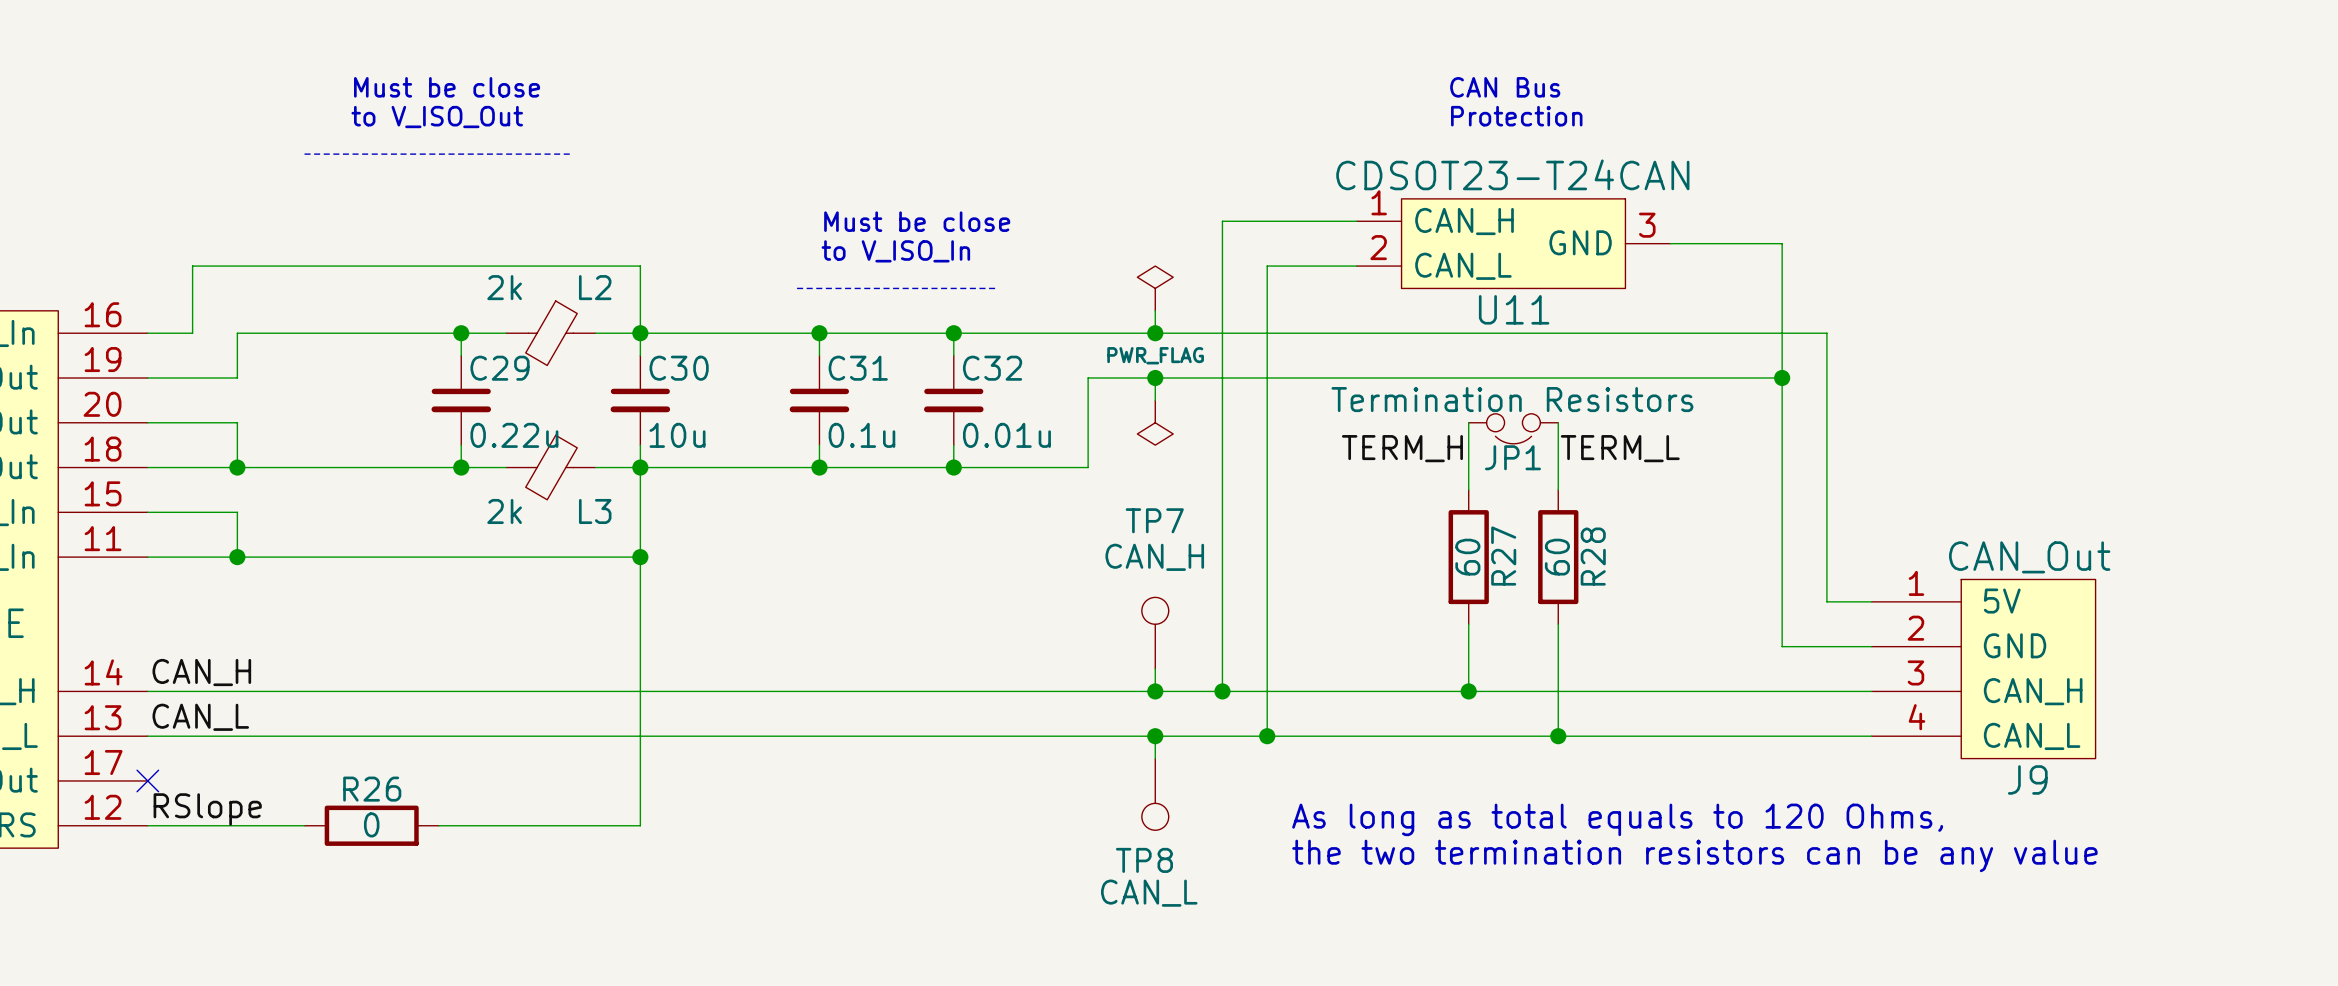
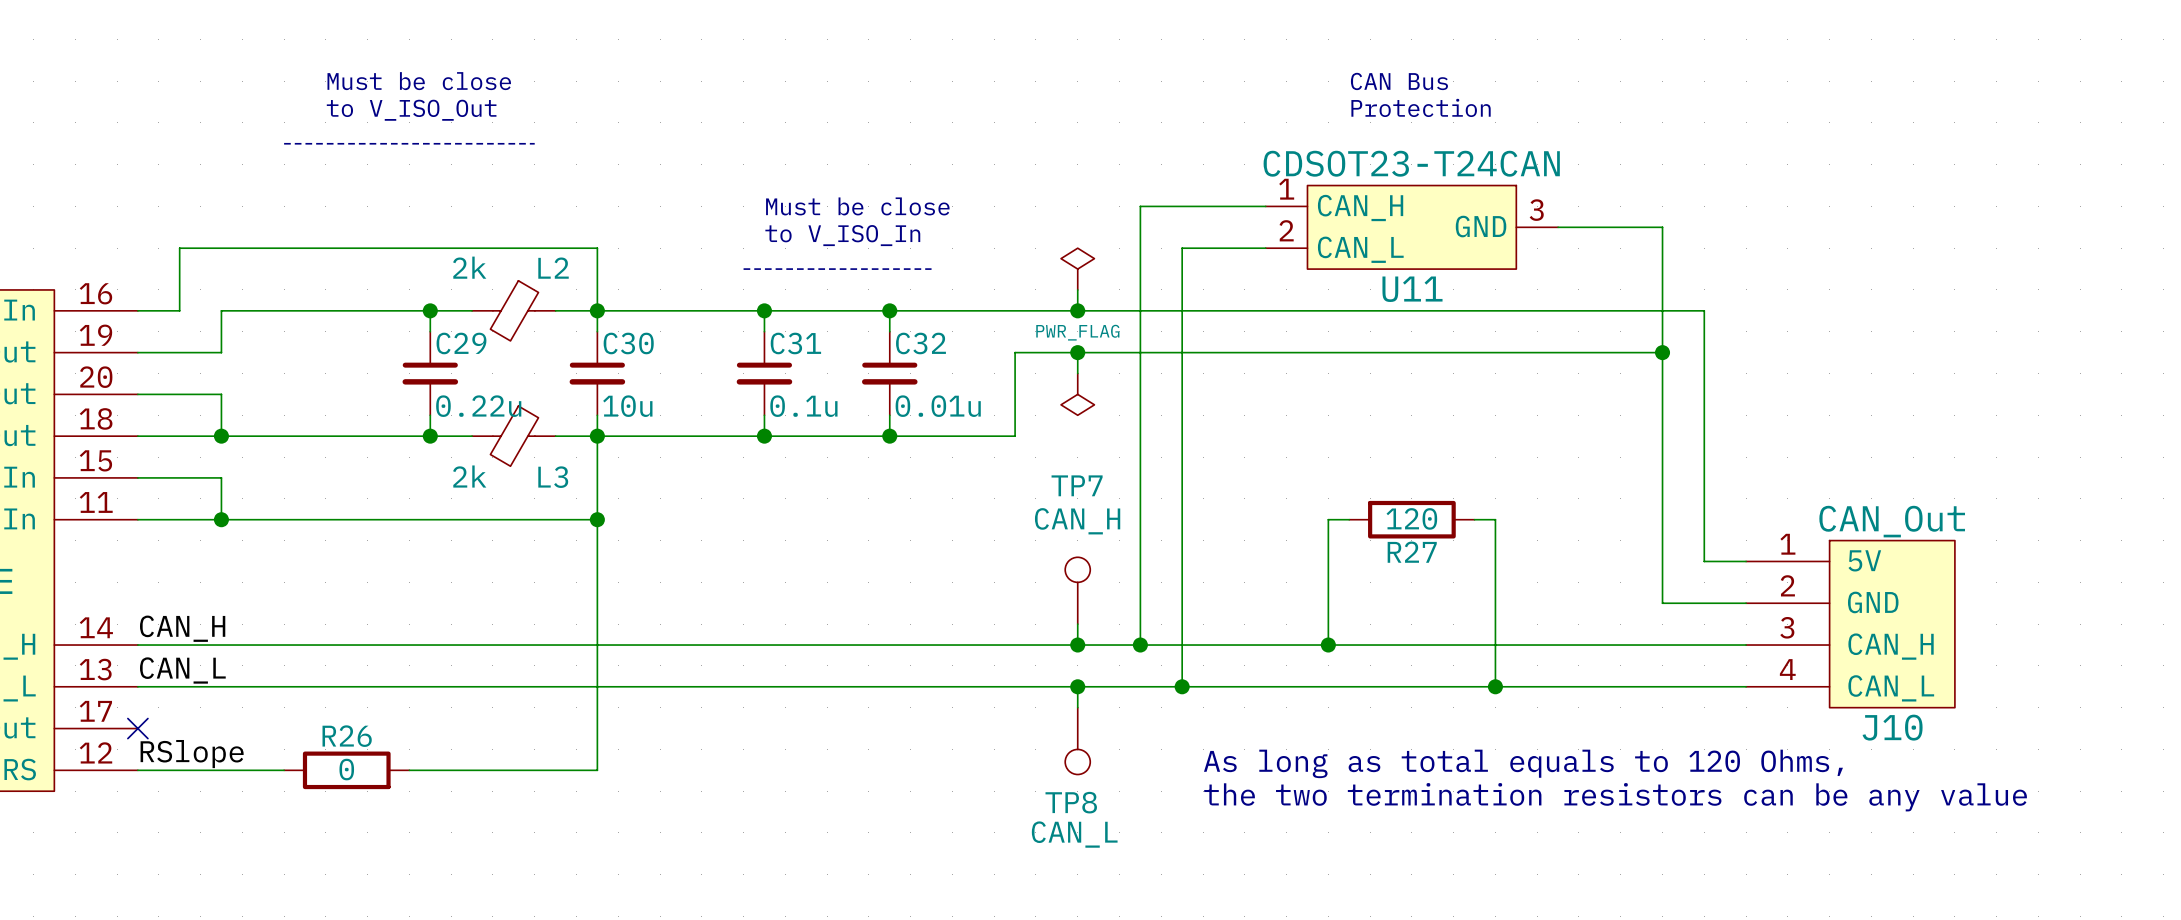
wire: (1468, 422) (1468, 489) -> none
wire: (1558, 422) (1558, 489) -> none
JP1: Termination Resistors (1513, 428) -> none
label: TERM_H (1402, 448) -> none
label: TERM_L (1620, 448) -> none
wire: none -> (1349, 519) (1328, 519) (1328, 645)
R27 value: 60 (1467, 557) -> 120 (1411, 518)
R27 rotation: 0° (1468, 557) -> 90° clockwise (1411, 519)
R28: 60 (1558, 557) -> none
wire: none -> (1474, 519) (1495, 519) (1495, 686)
wire: (1468, 624) (1468, 691) -> none
wire: (1558, 624) (1558, 736) -> none
junction position: (1468, 691) -> (1328, 645)
junction position: (1558, 736) -> (1495, 686)
J9 name: J9 (2027, 779) -> J10 (1892, 727)

